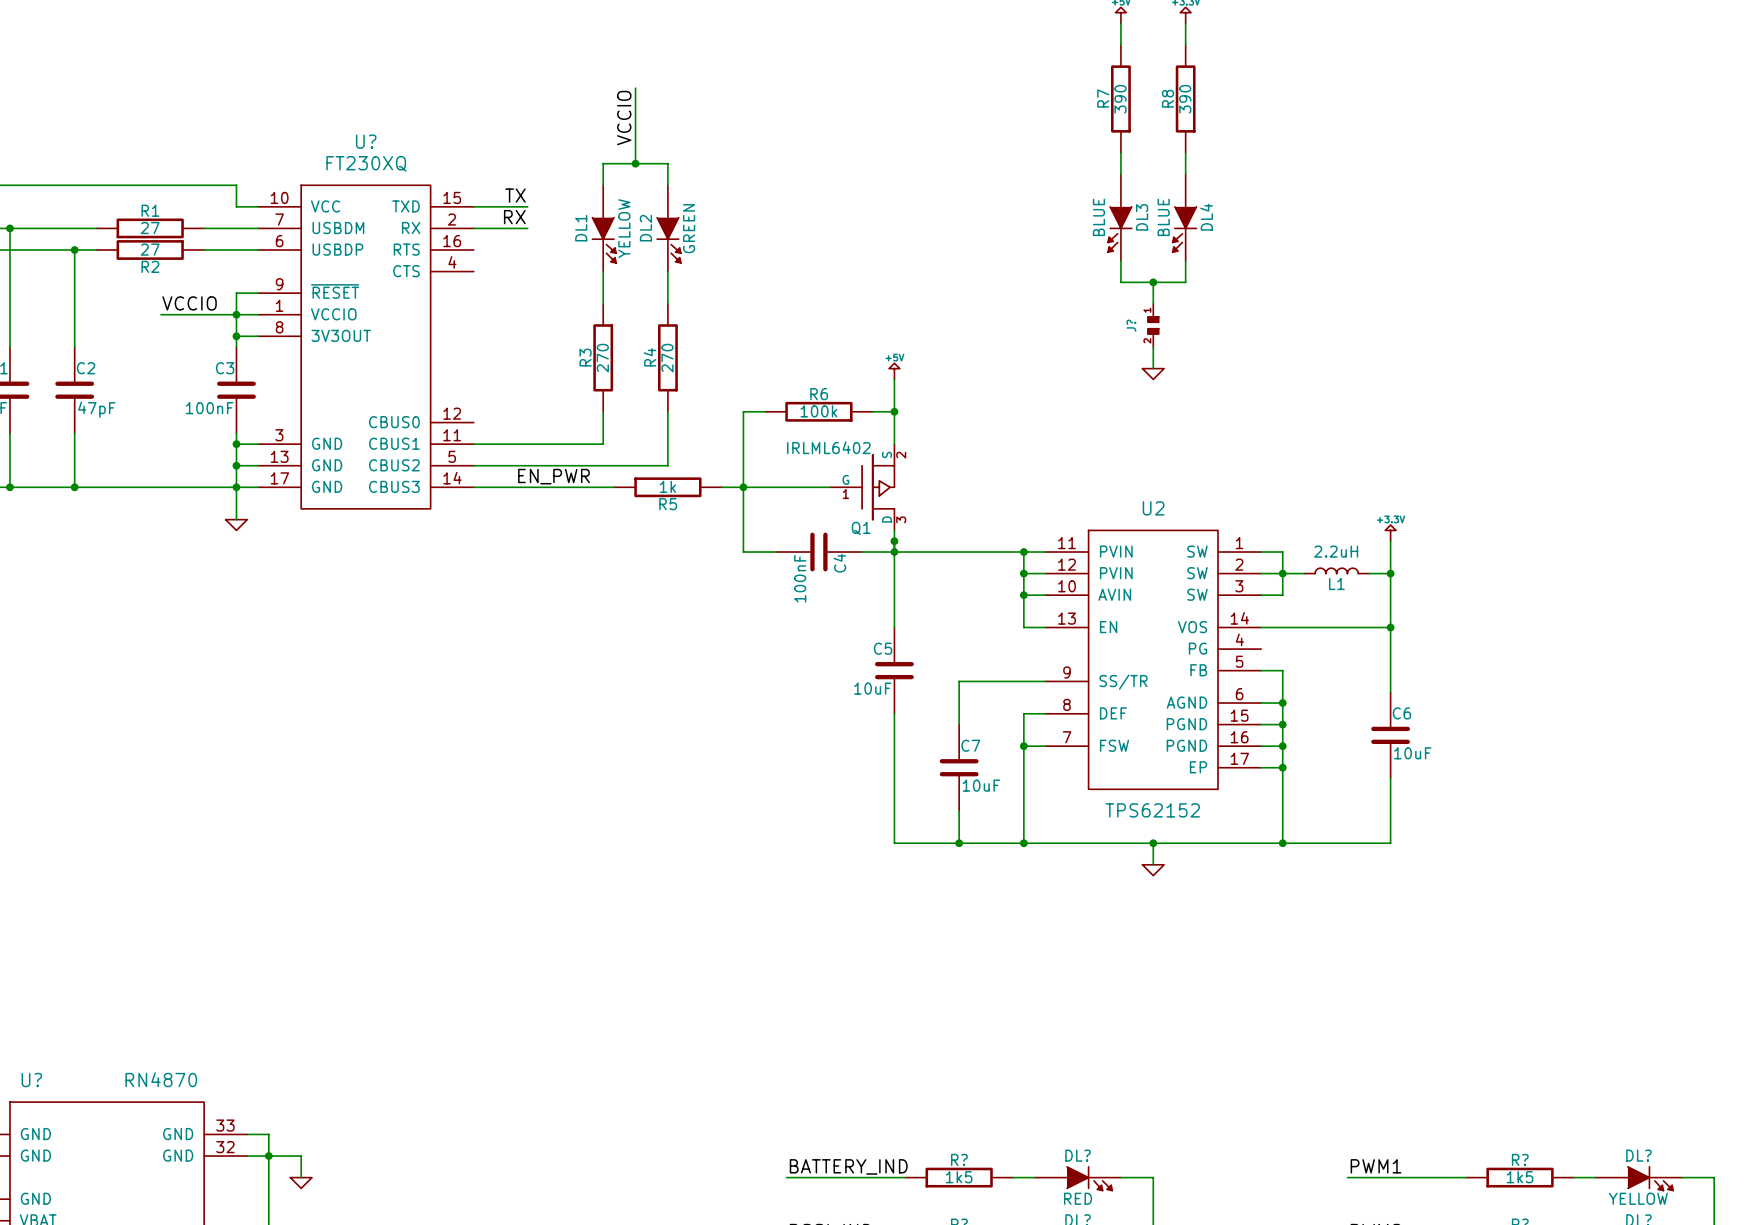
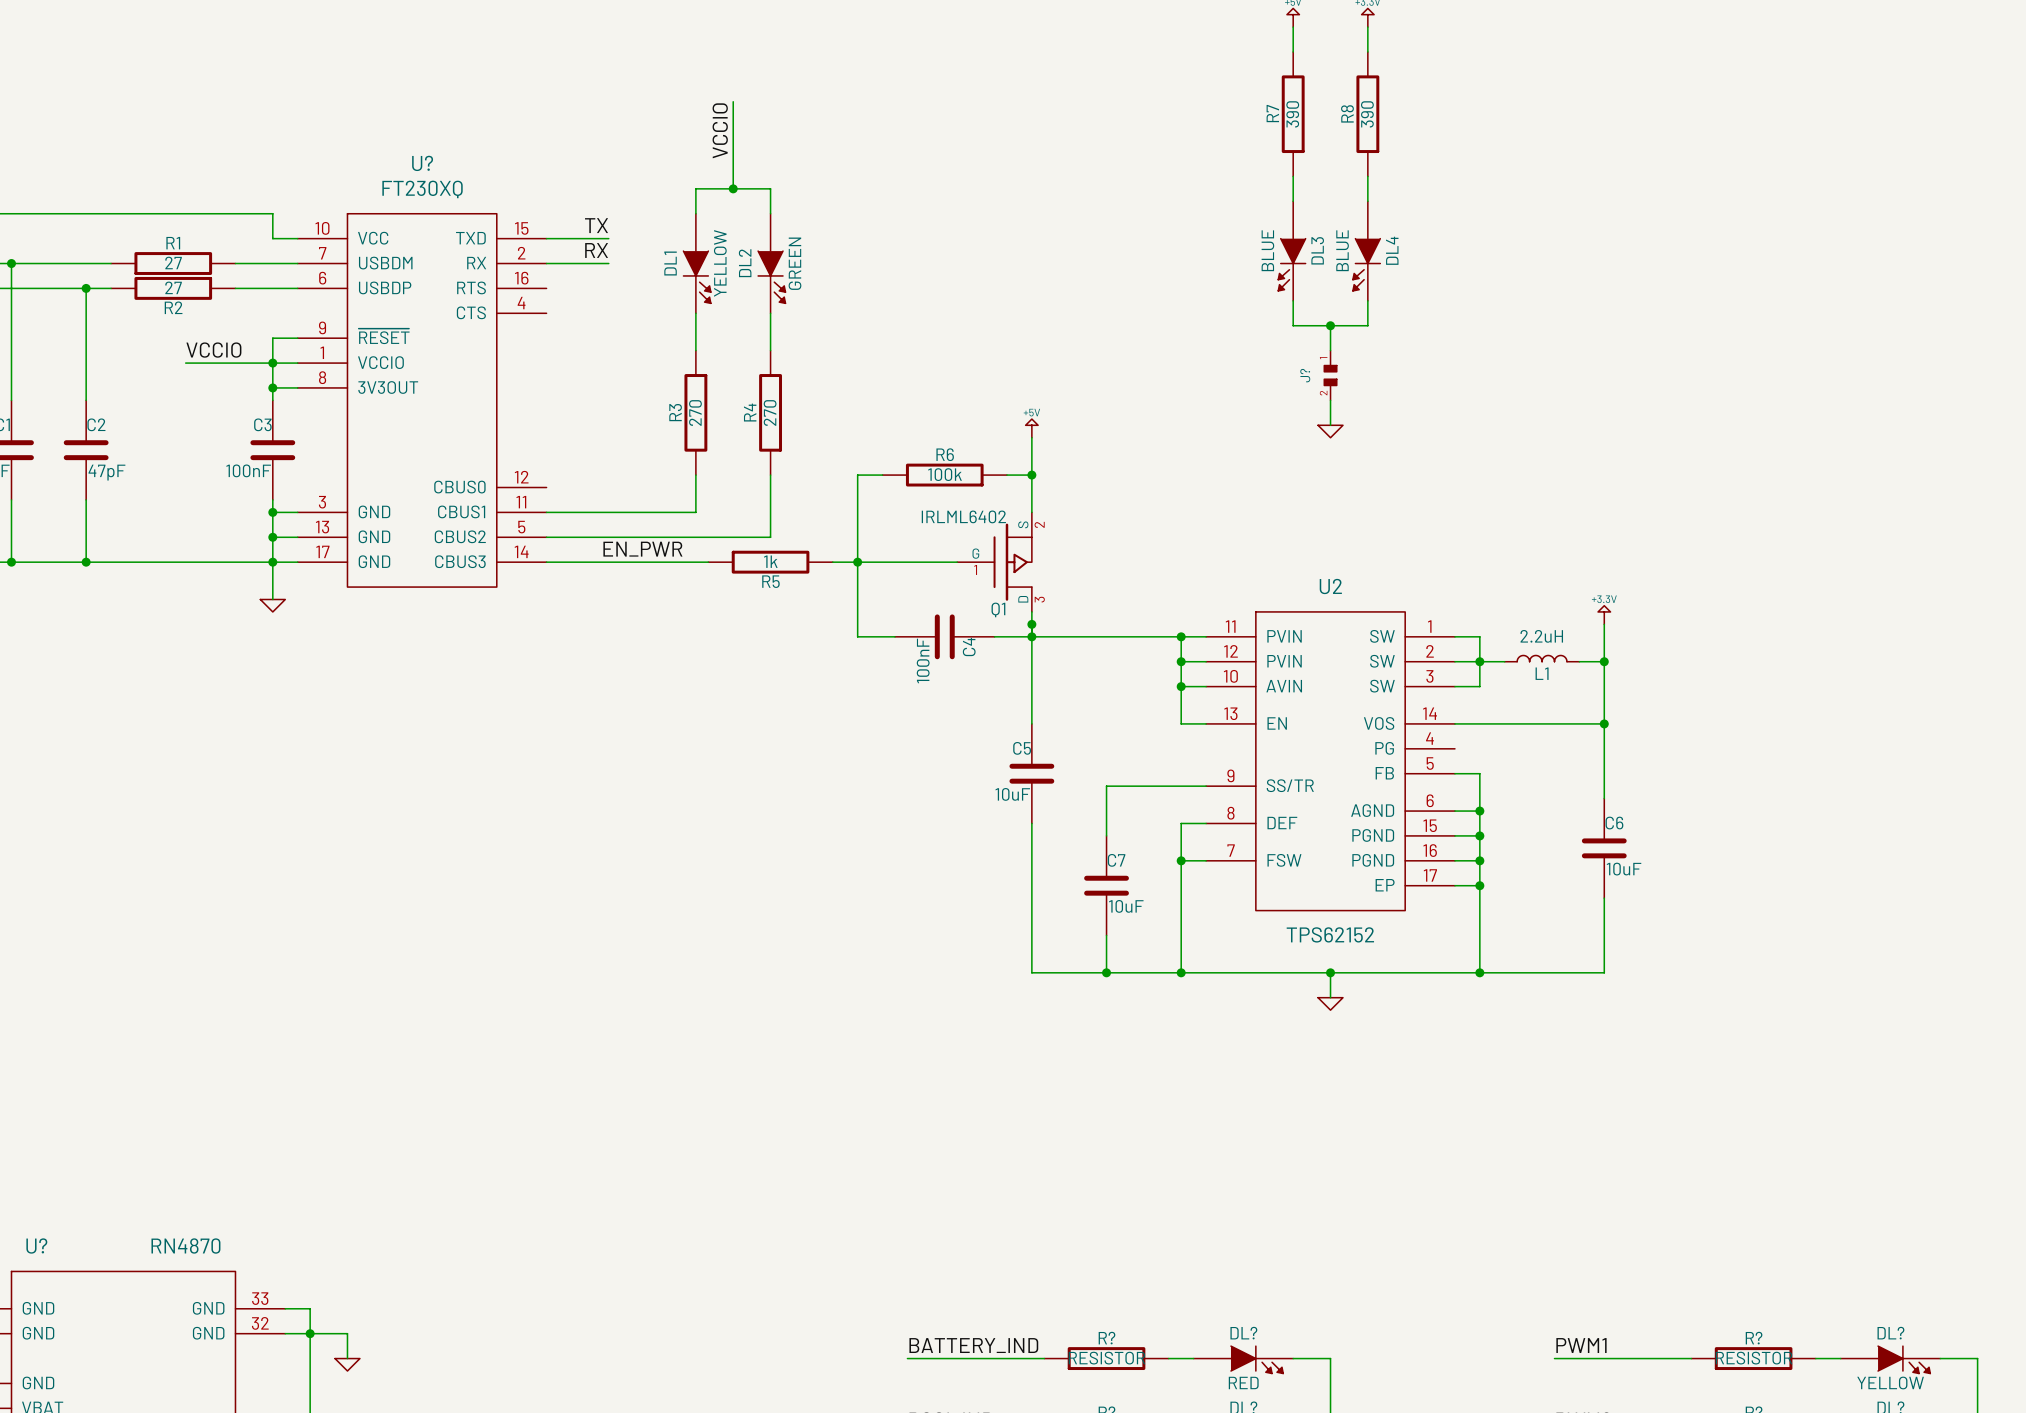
R? value: 1k5 (959, 1177) -> RESISTOR (1106, 1358)
R? value: 1k5 (1520, 1177) -> RESISTOR (1754, 1358)

